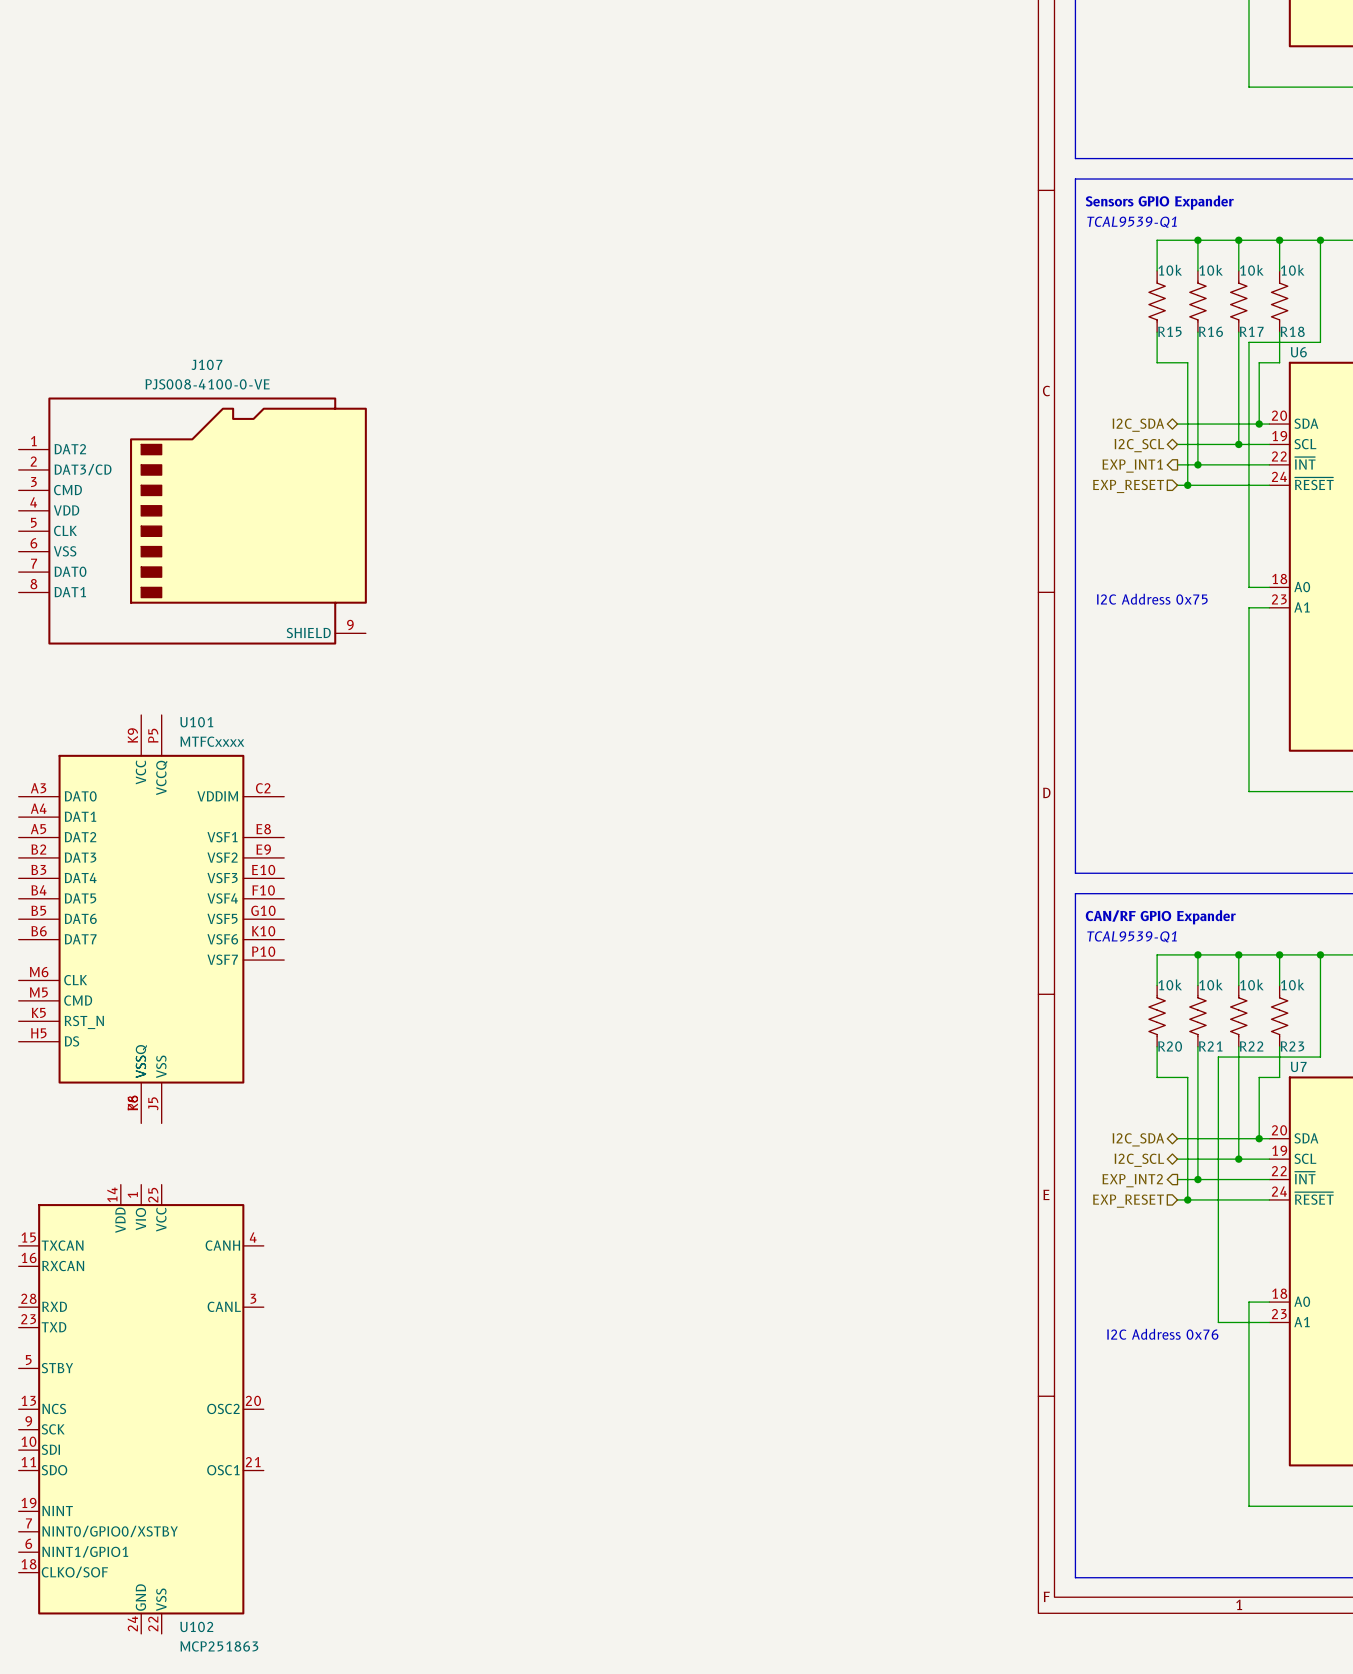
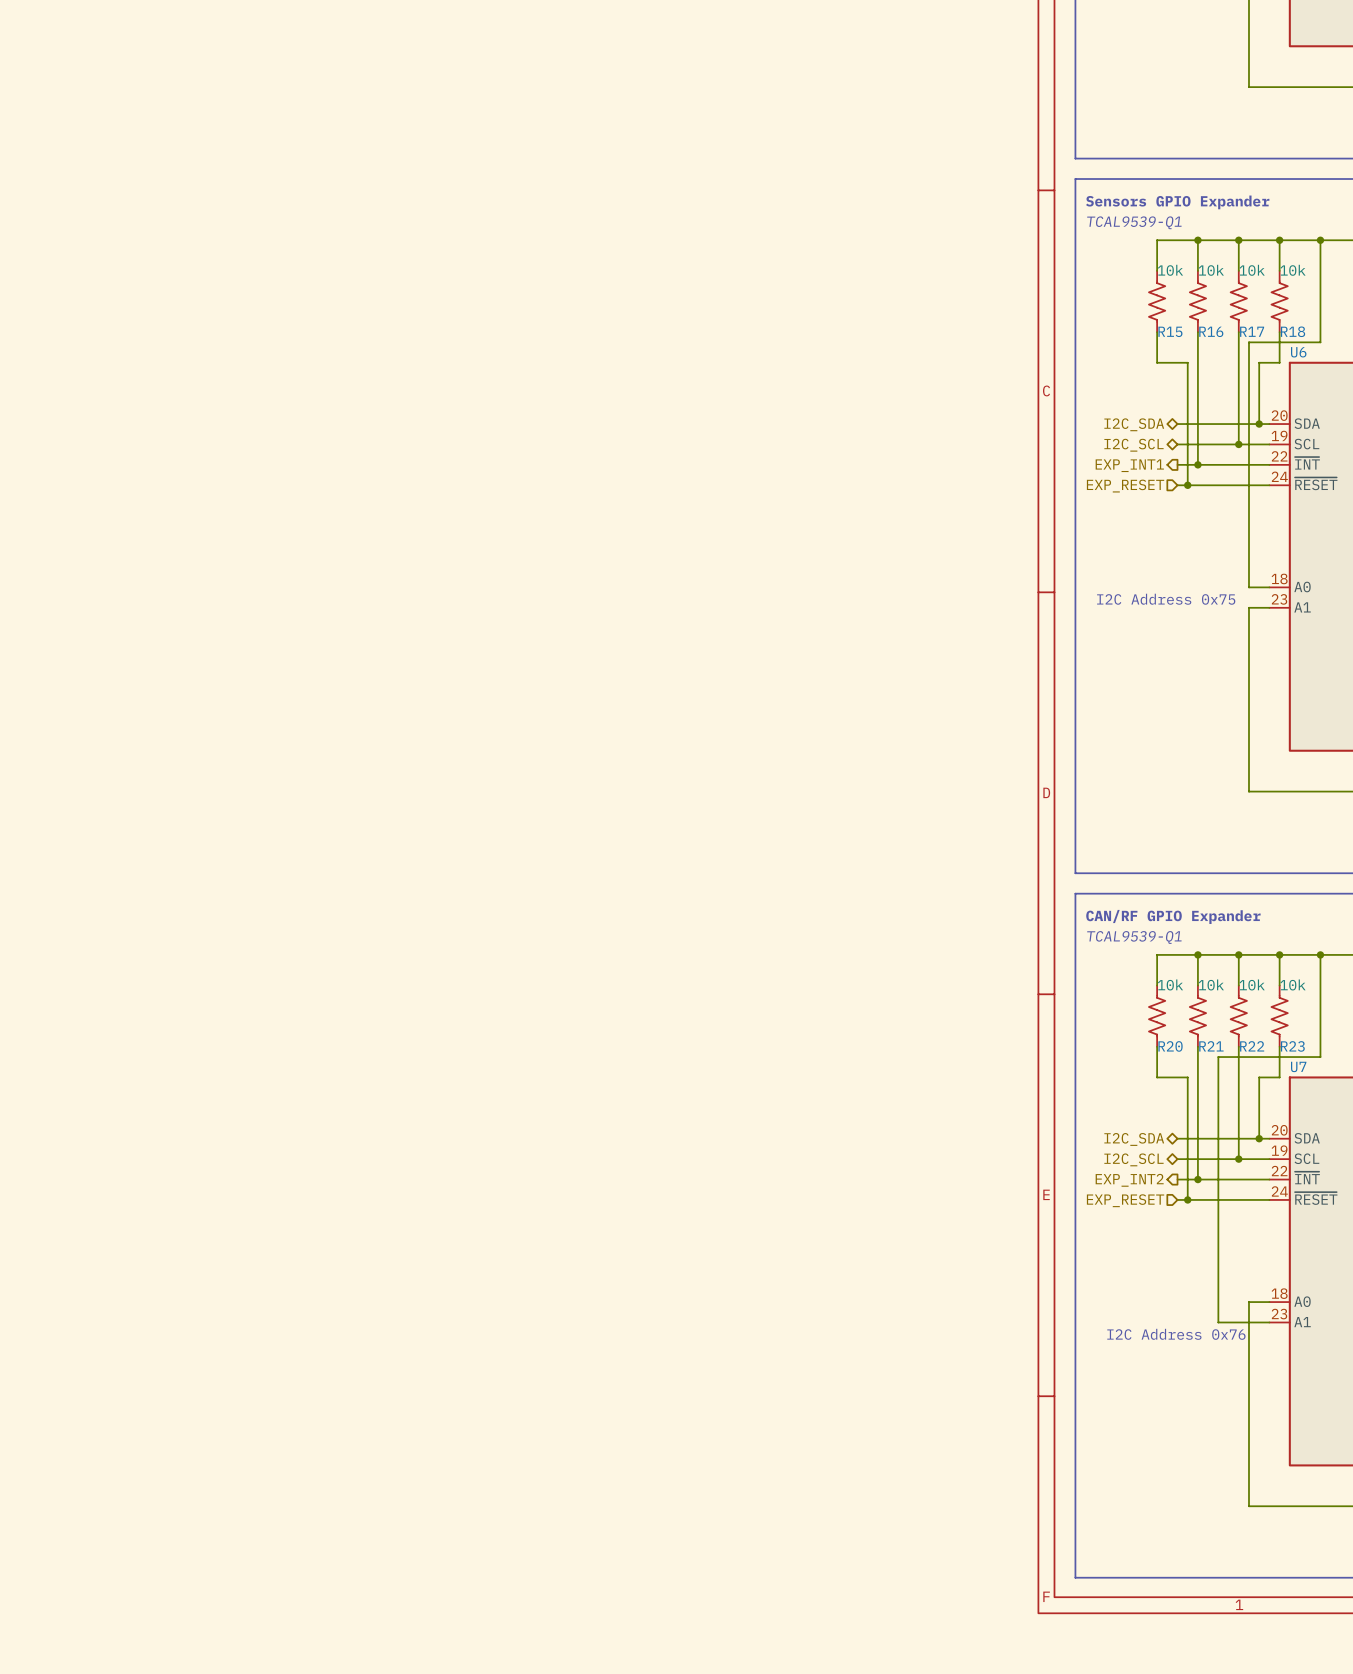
J107: PJS008-4100-0-VE (192, 521) -> none
U101: MTFCxxxx (151, 919) -> none
U102: MCP251863 (141, 1409) -> none

